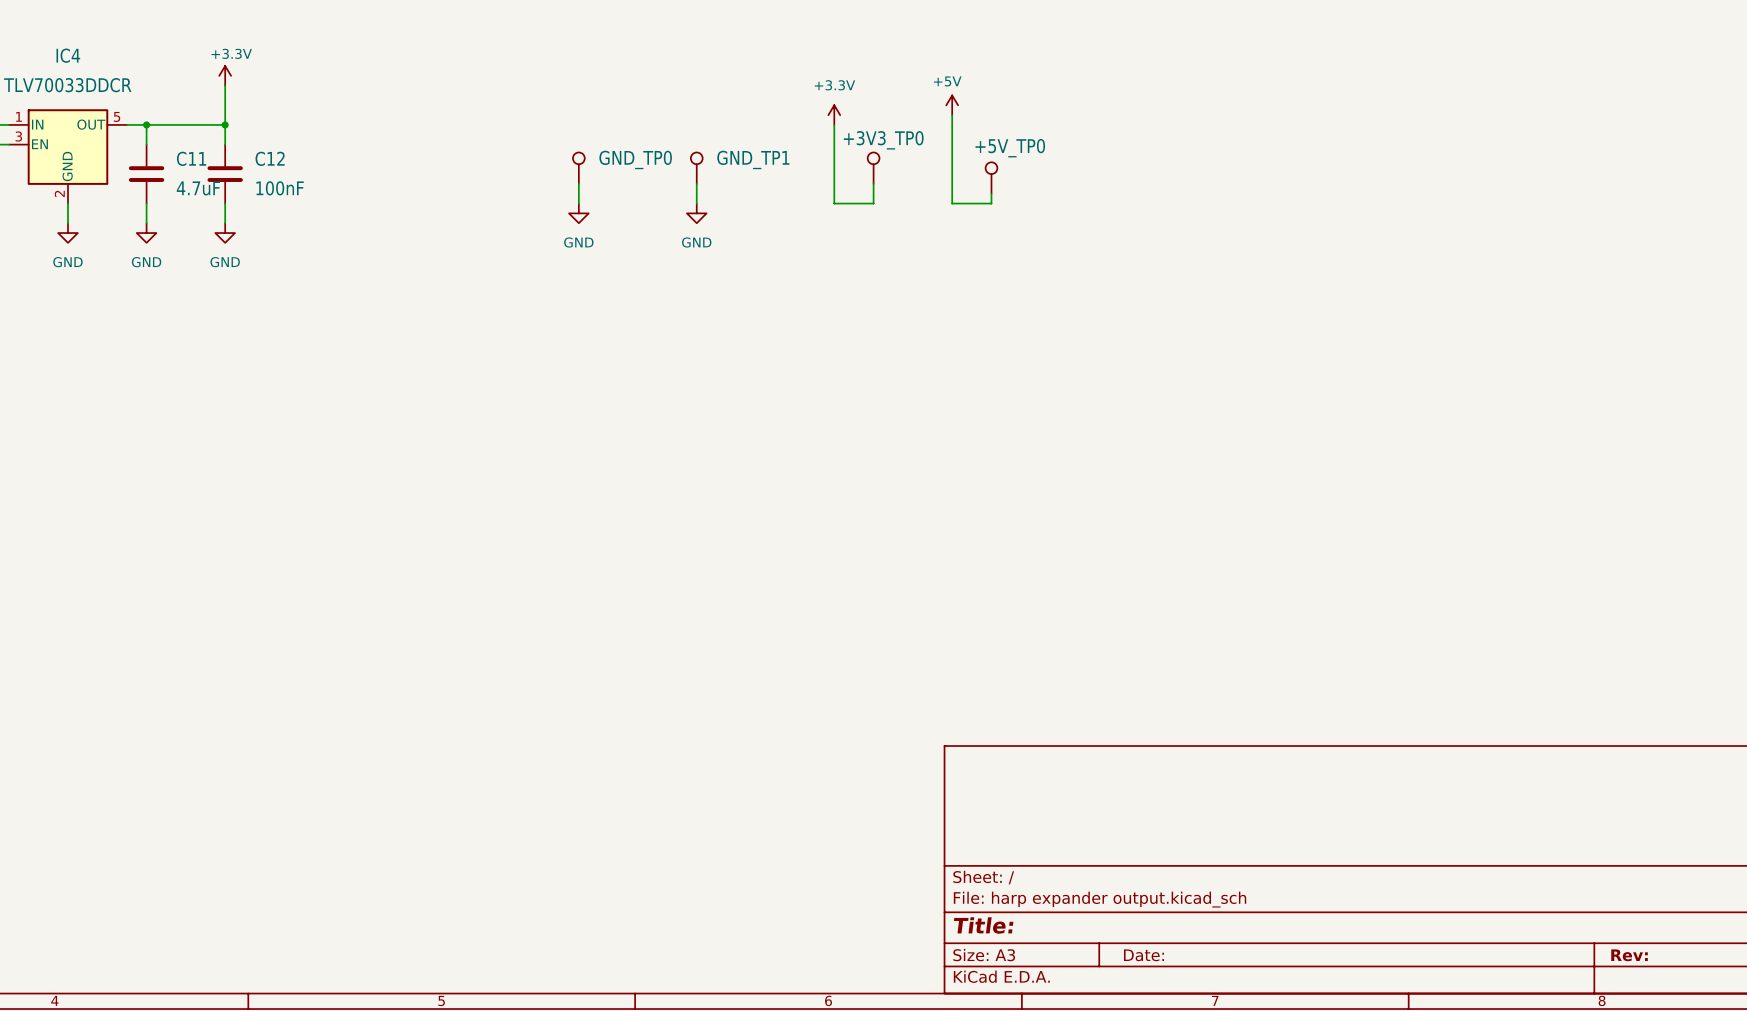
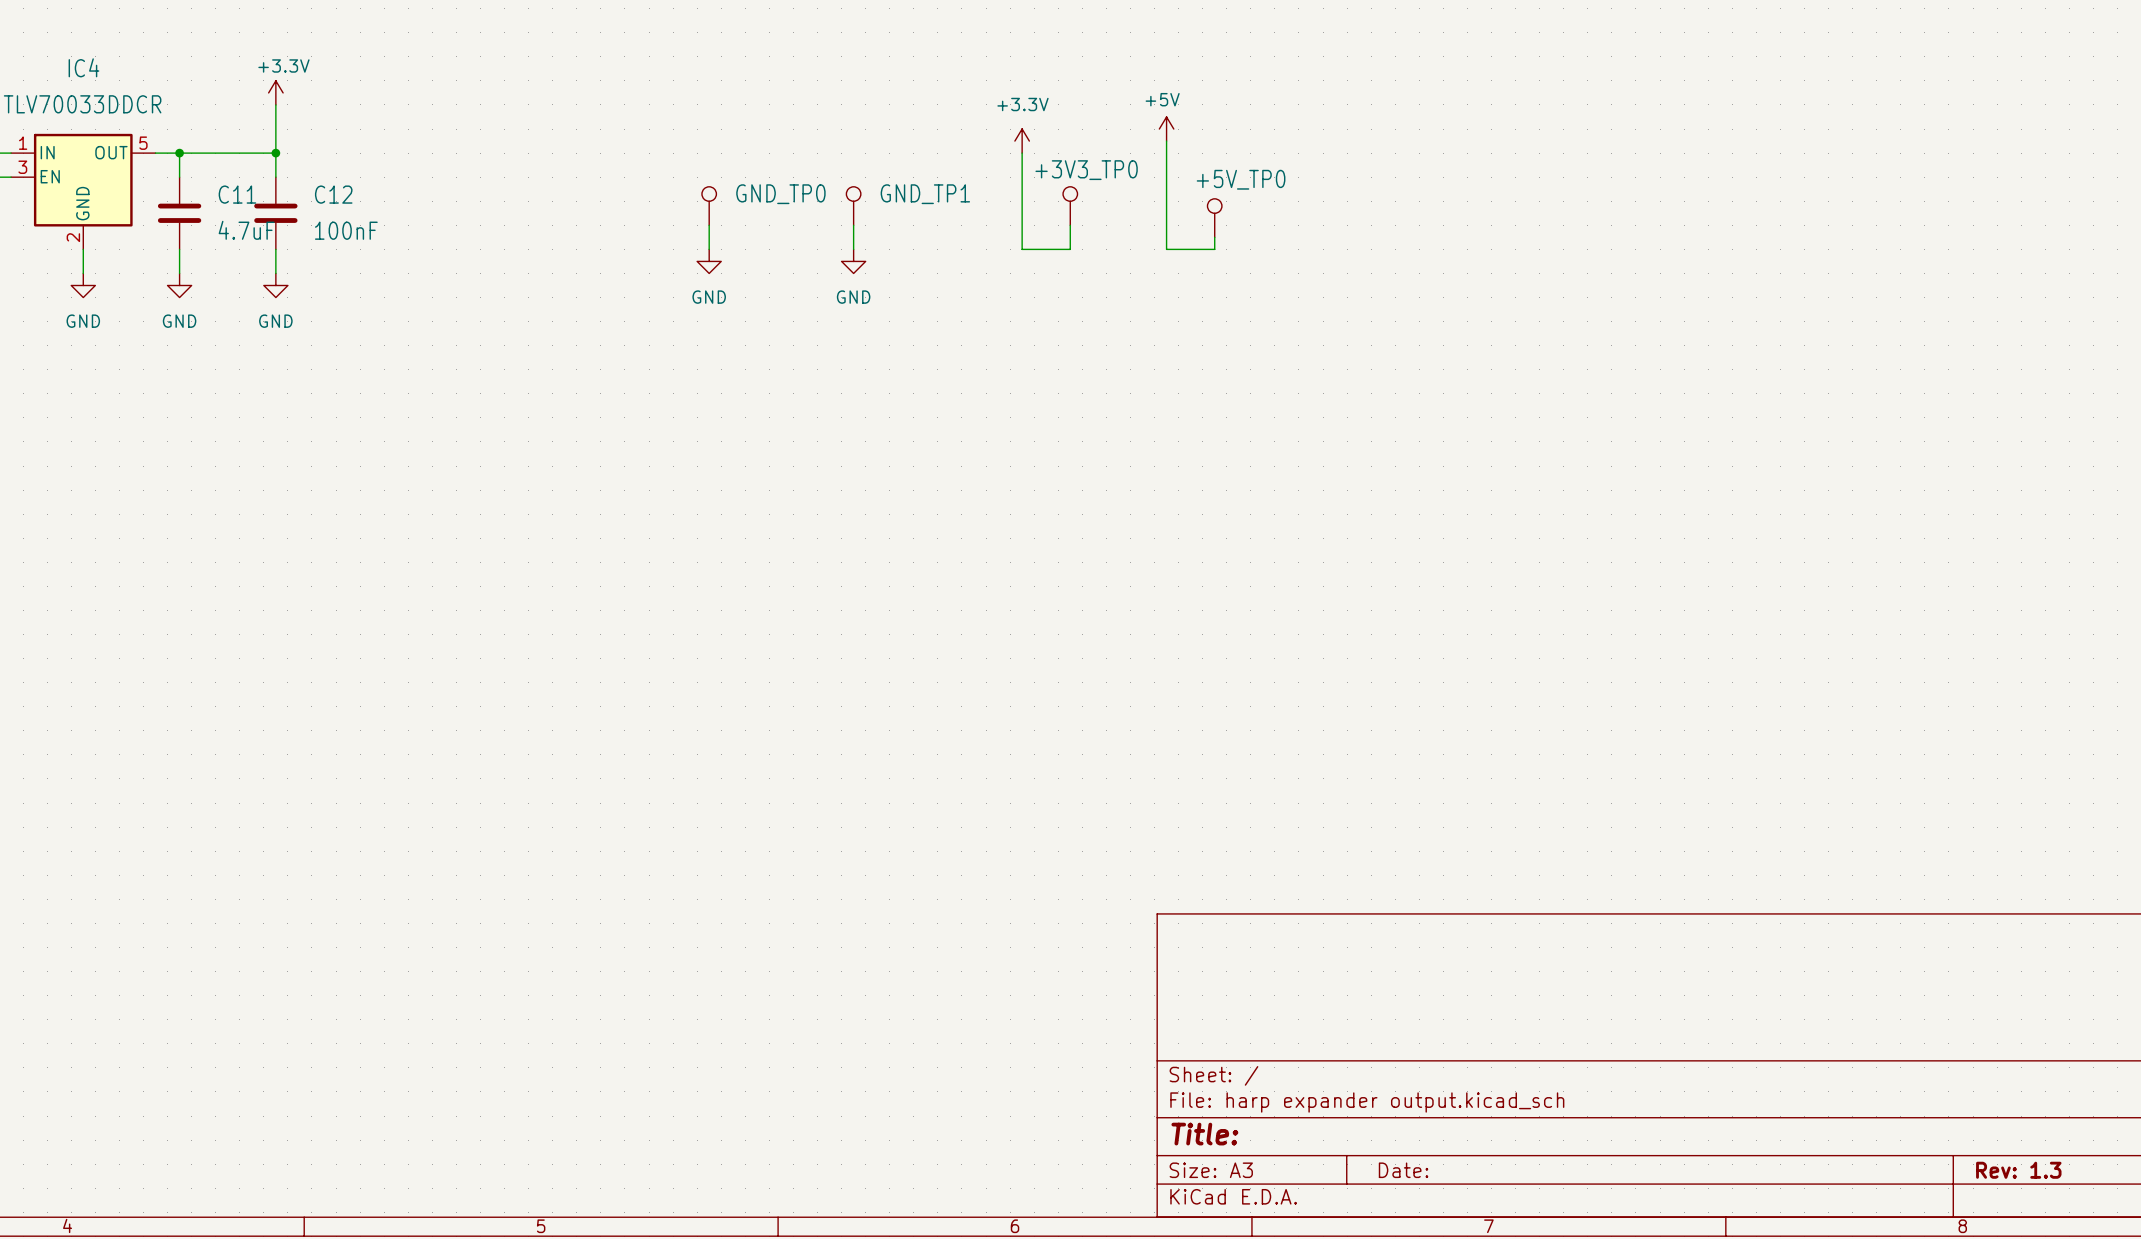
title block: Rev: (1629, 955) -> Rev: 1.3 (2018, 1170)

